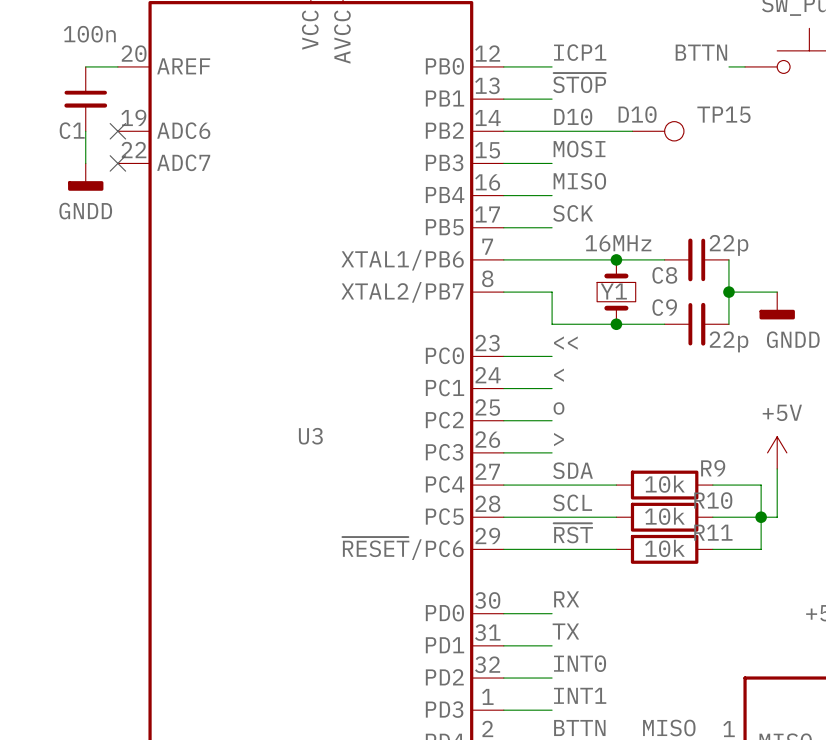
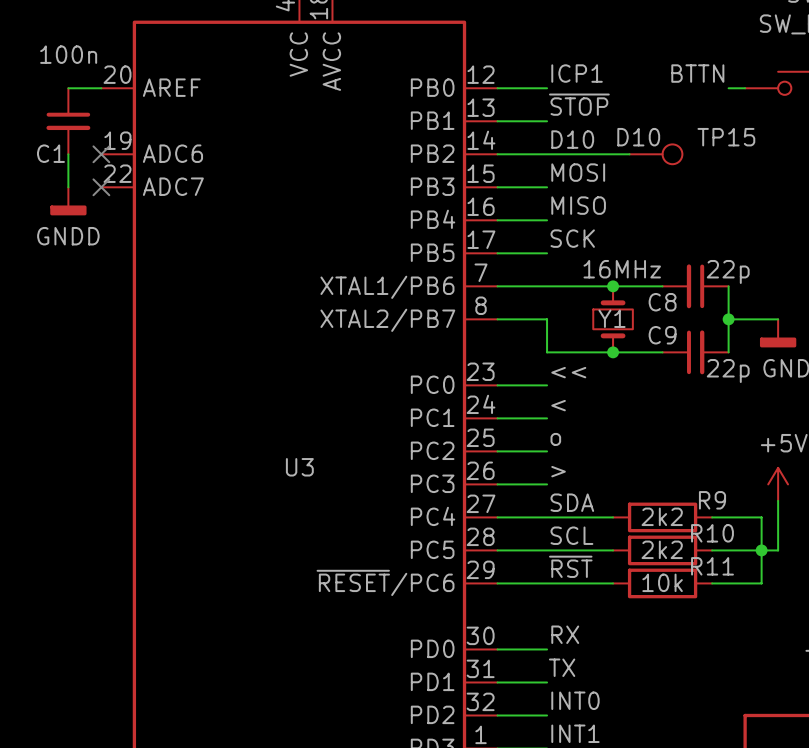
R9 value: 10k (664, 484) -> 2k2 (662, 516)
R10 value: 10k (664, 516) -> 2k2 (662, 549)

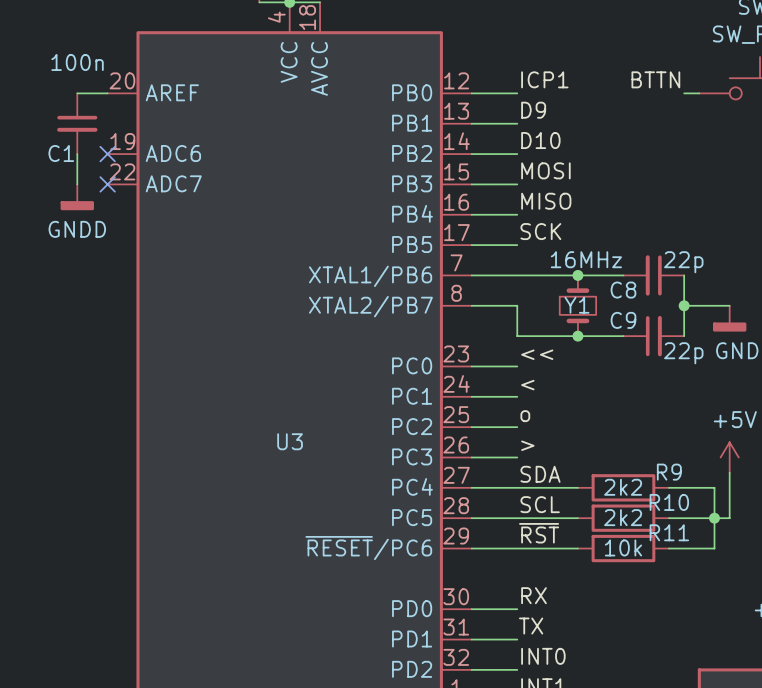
label: ~{STOP} (579, 104) -> D9 (533, 110)
wire: (547, 154) (629, 154) -> none
TP15: D10 (655, 154) -> none

